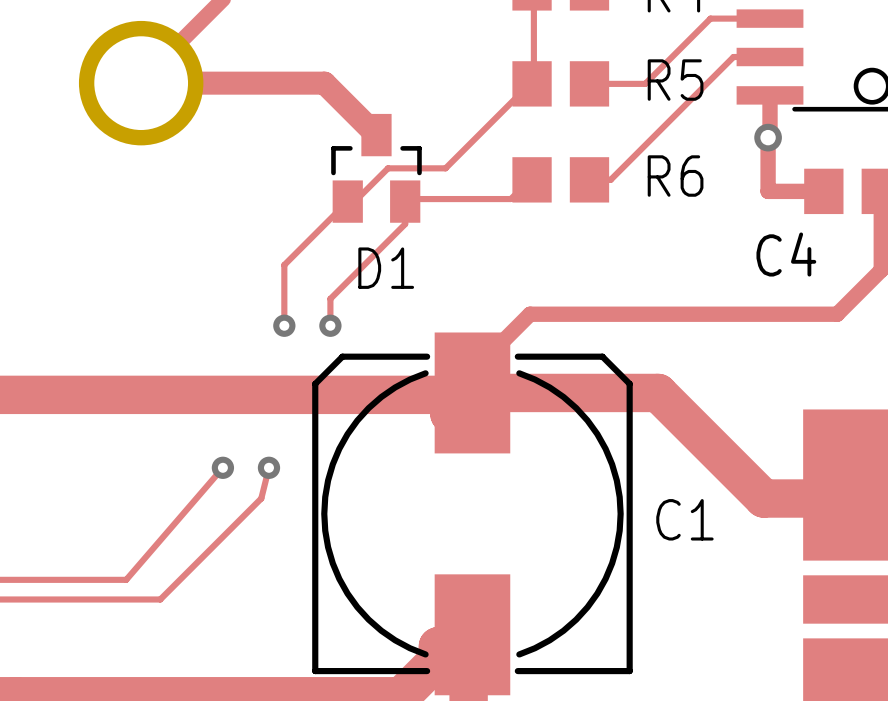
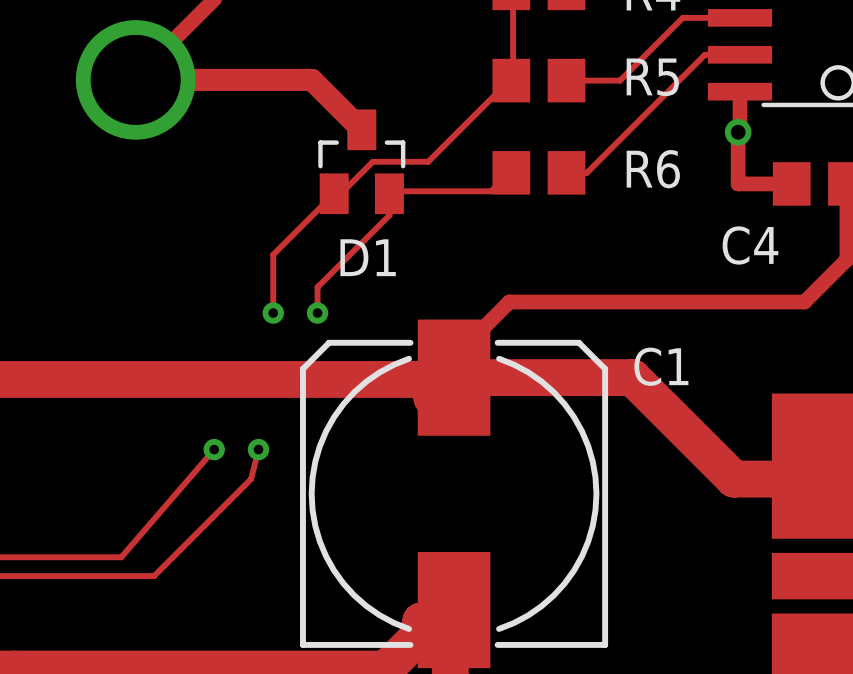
C1 name position: C1 (684, 519) -> C1 (661, 366)

